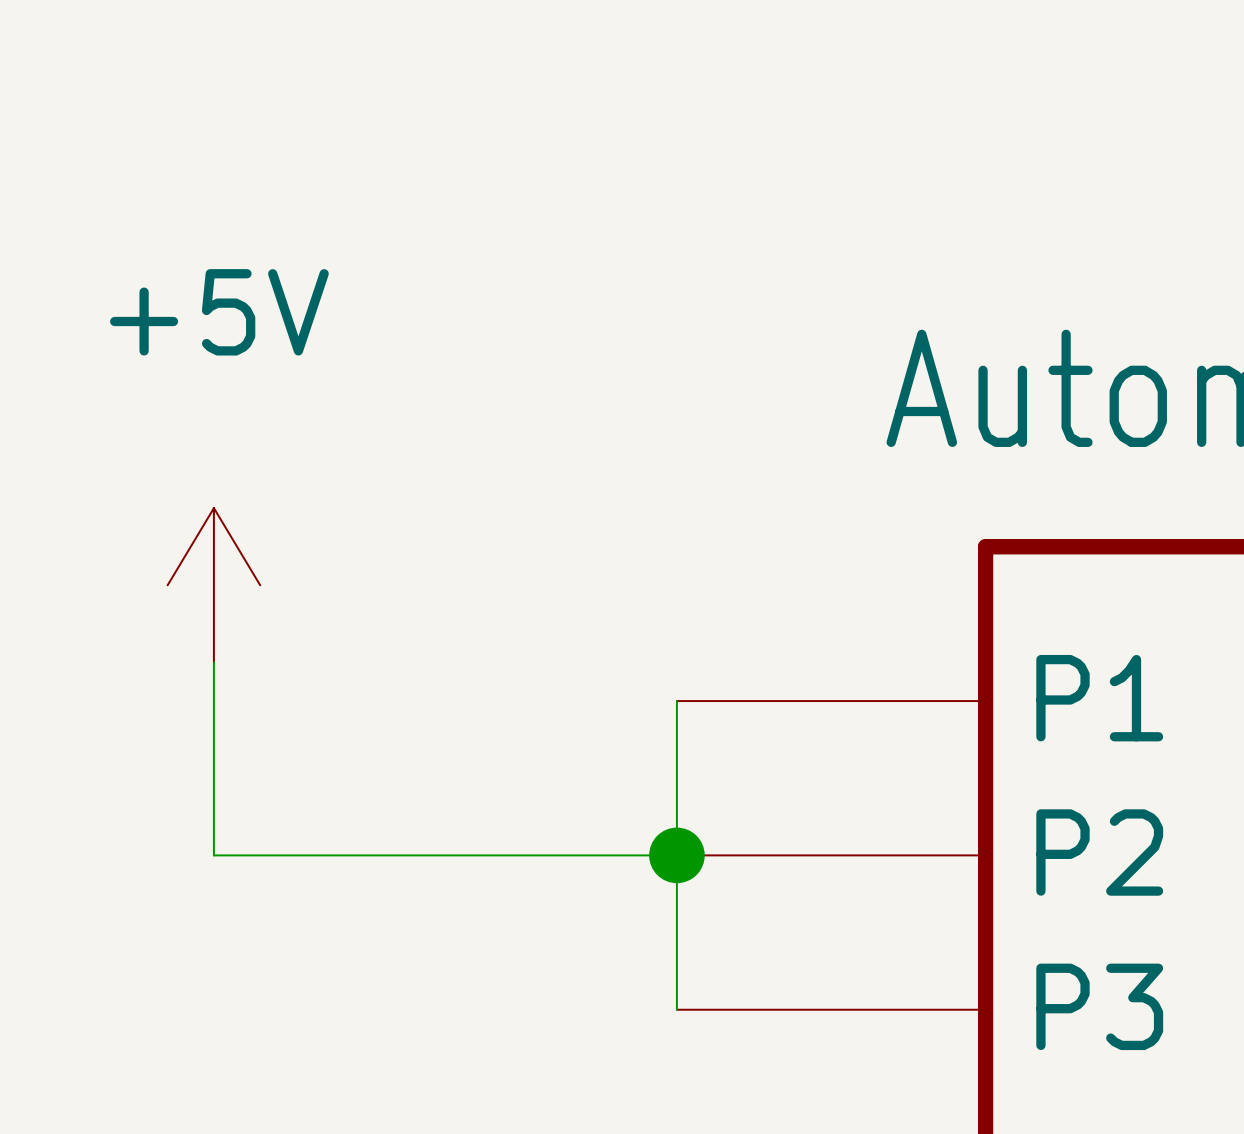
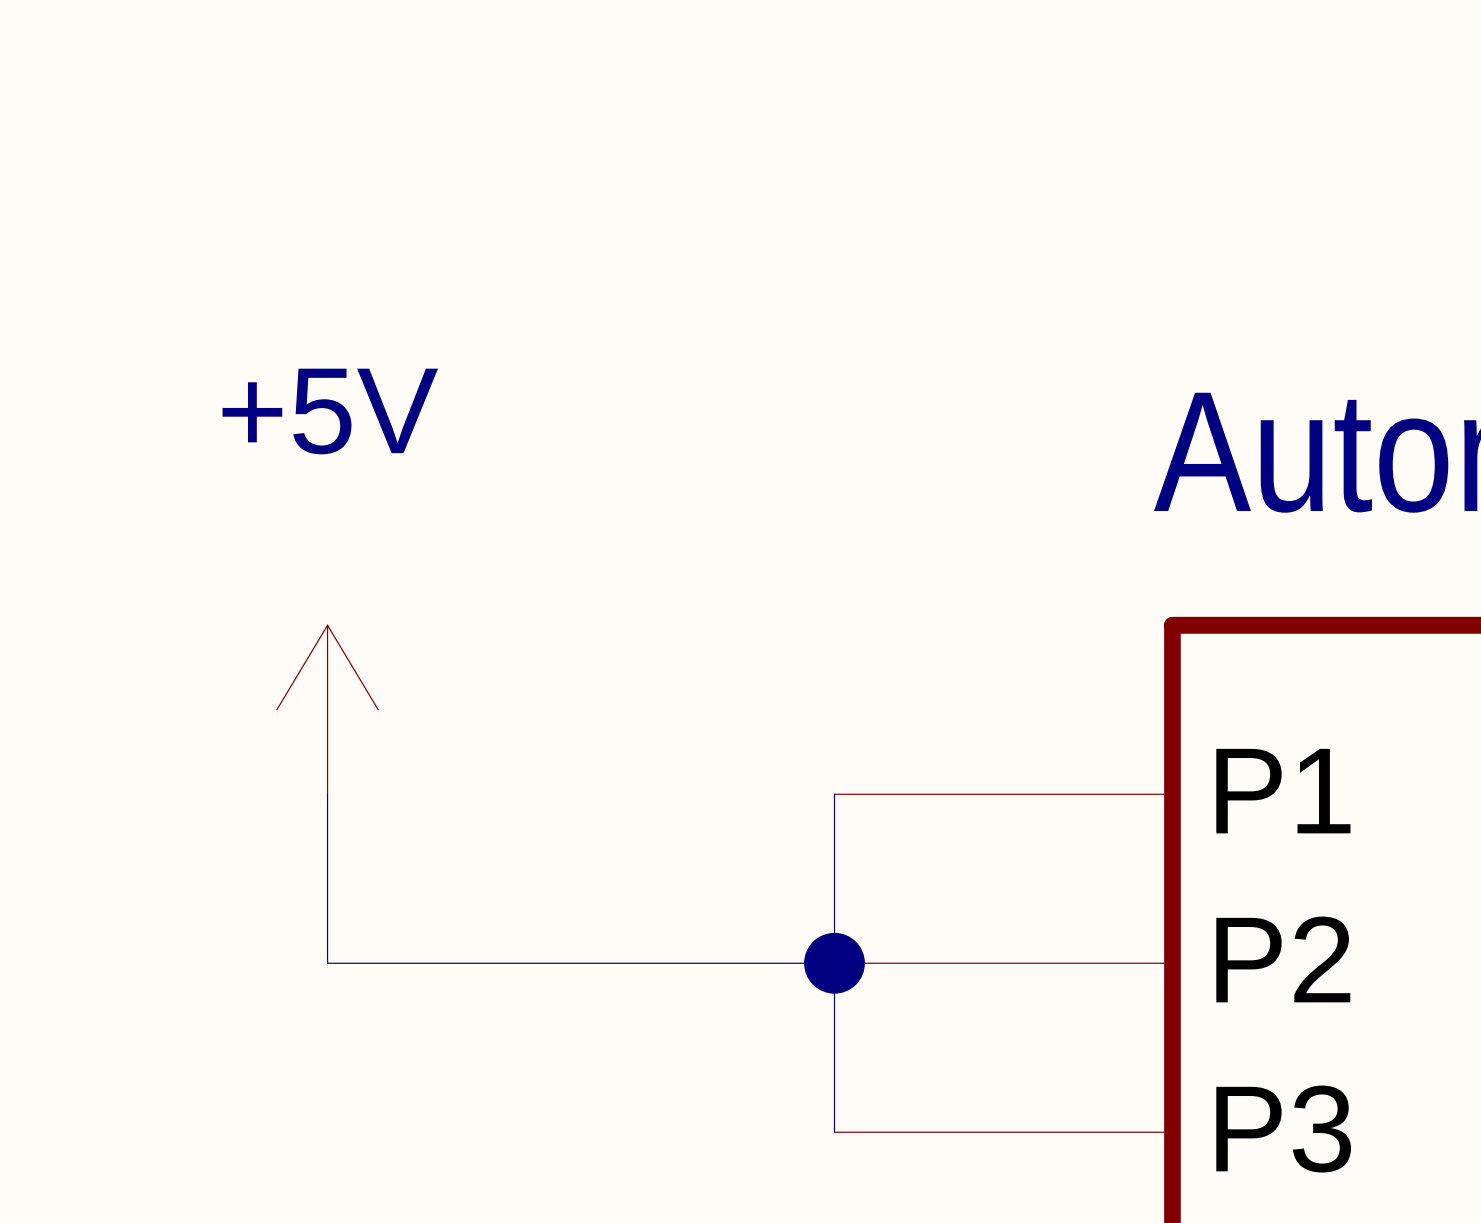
power symbol position: +5V (213, 585) -> +5V (327, 709)

